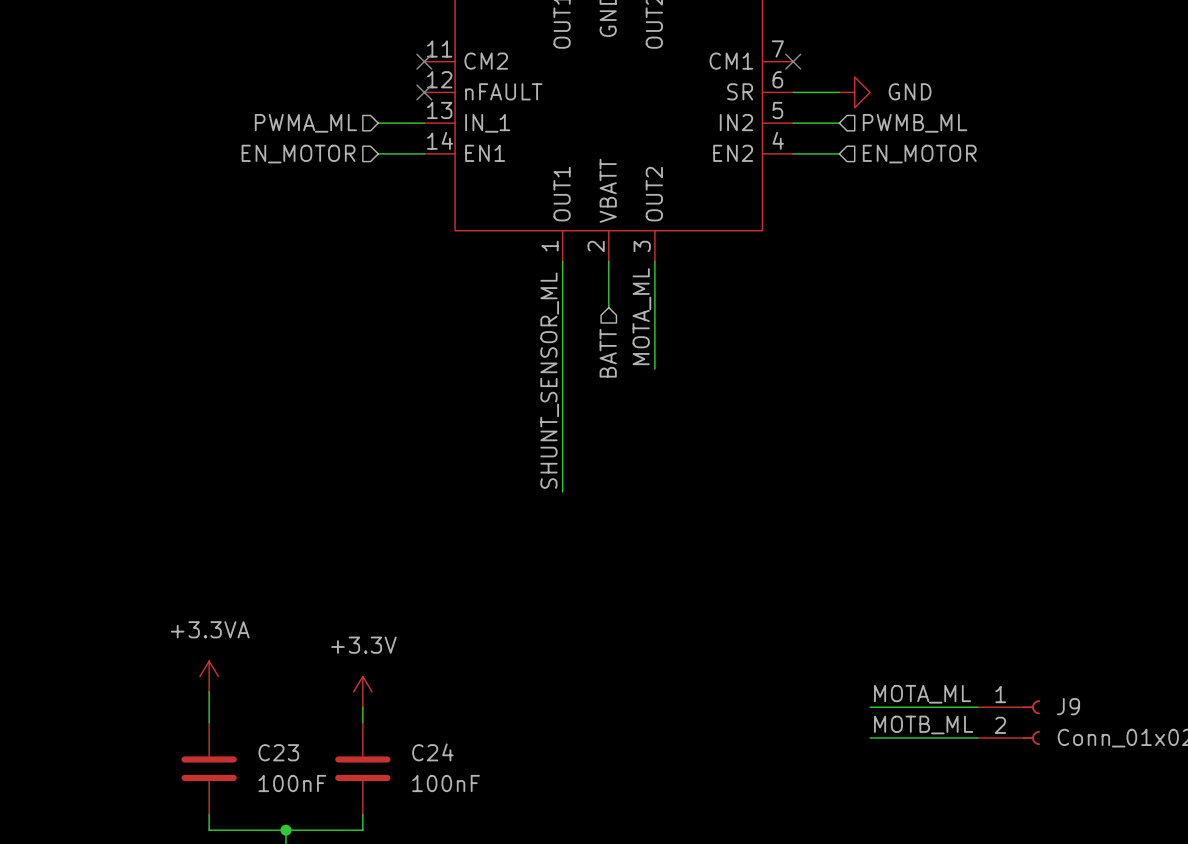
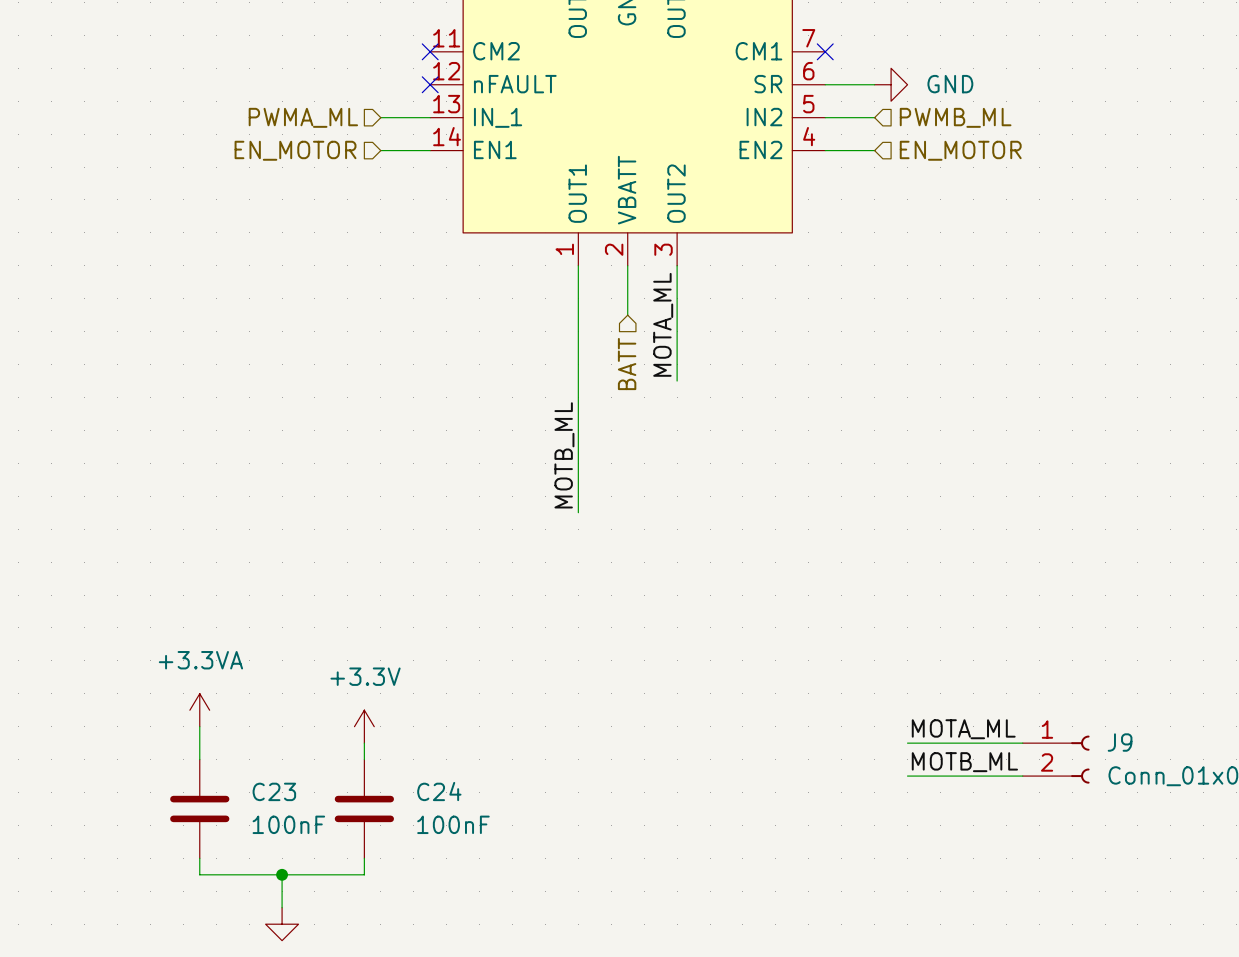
label: SHUNT_SENSOR_ML (549, 380) -> MOTB_ML (564, 455)

